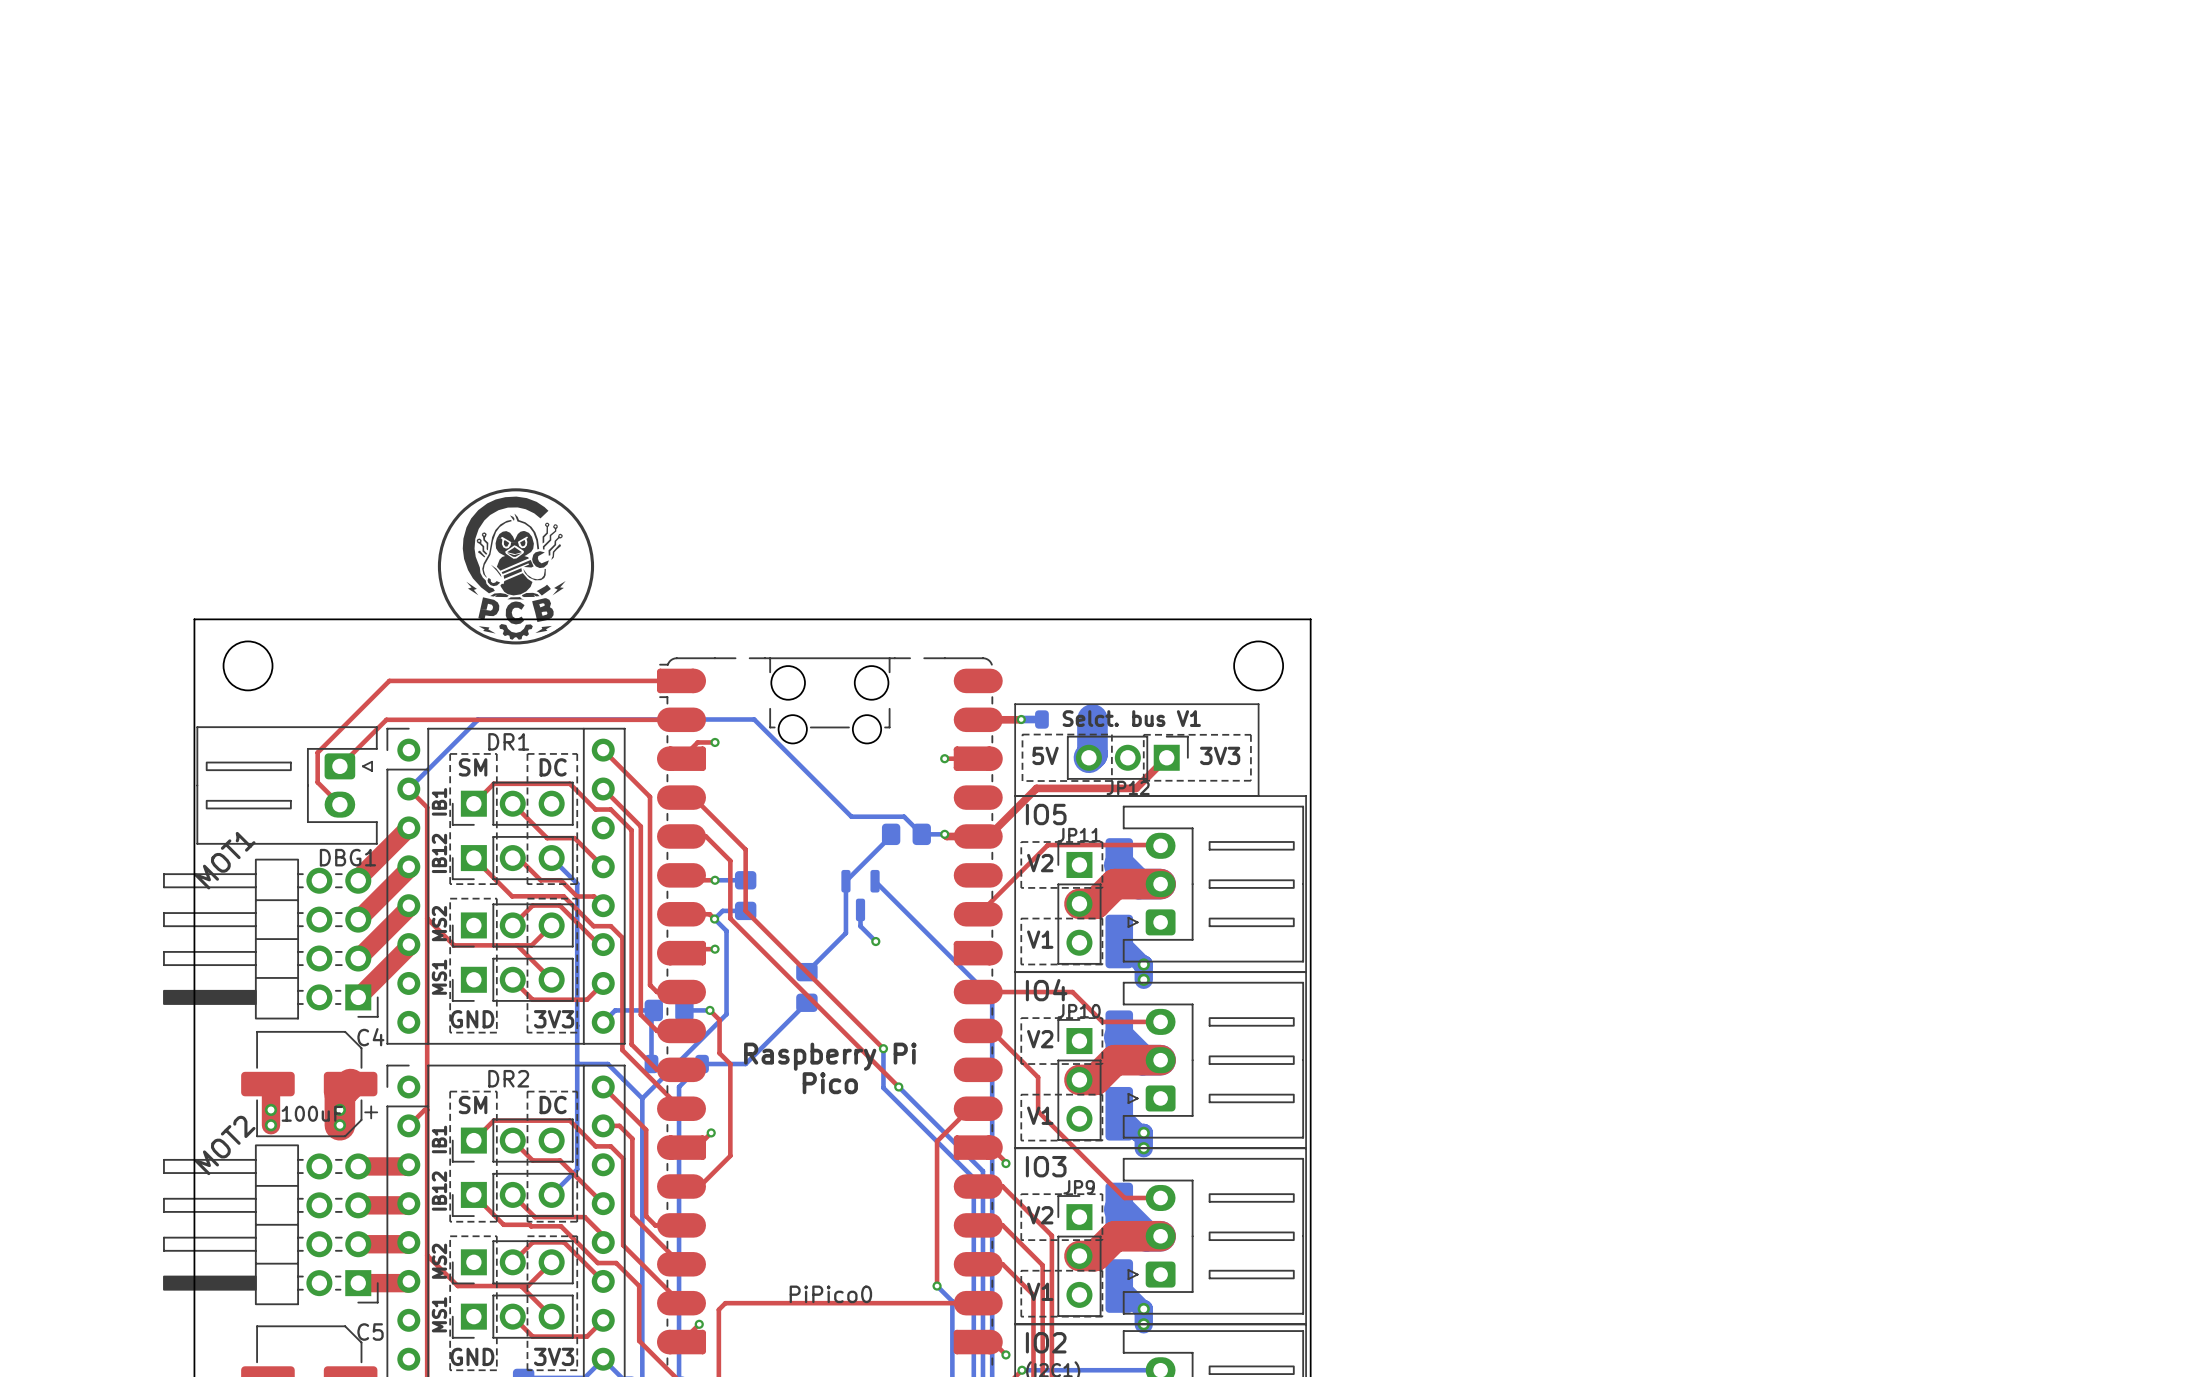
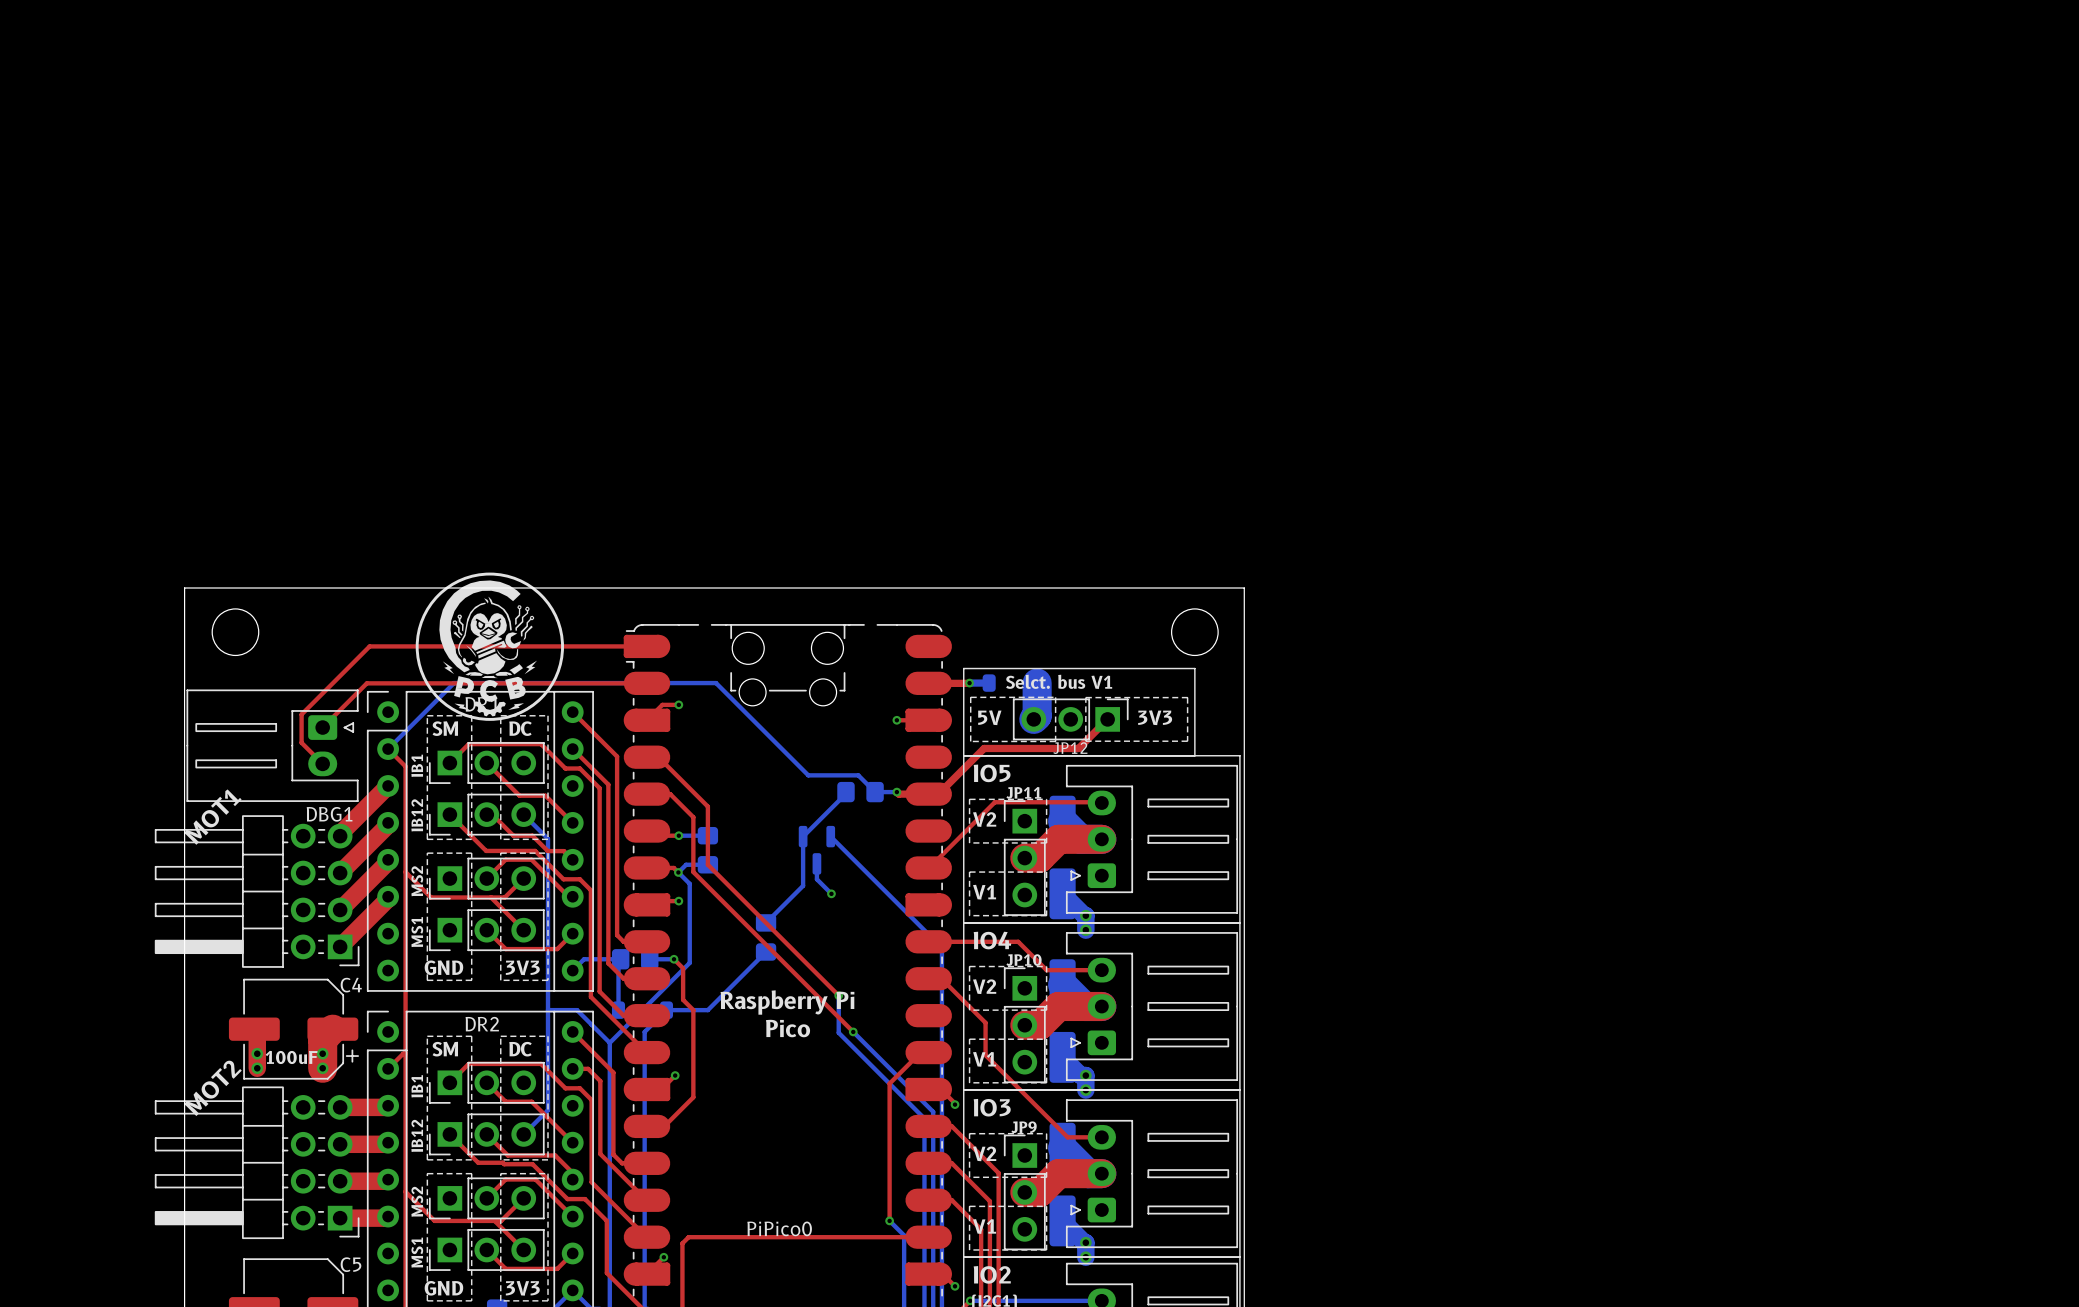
drawing position: (515, 566) -> (489, 646)

